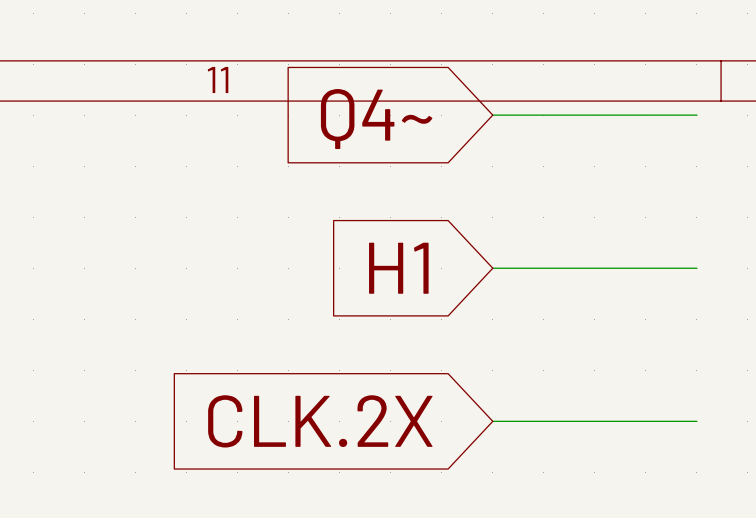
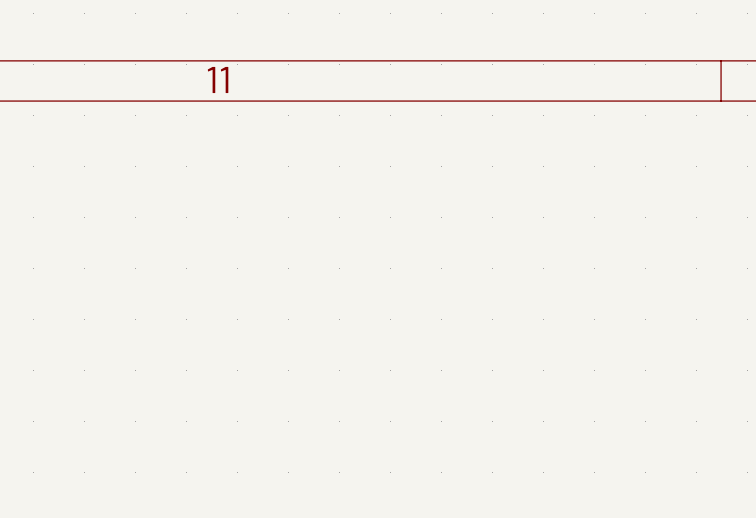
wire: (492, 115) (696, 115) -> none
global label: Q4~ (376, 119) -> none
global label: H1 (398, 268) -> none
wire: (492, 268) (696, 268) -> none
global label: CLK.2X (320, 421) -> none
wire: (492, 421) (696, 421) -> none

